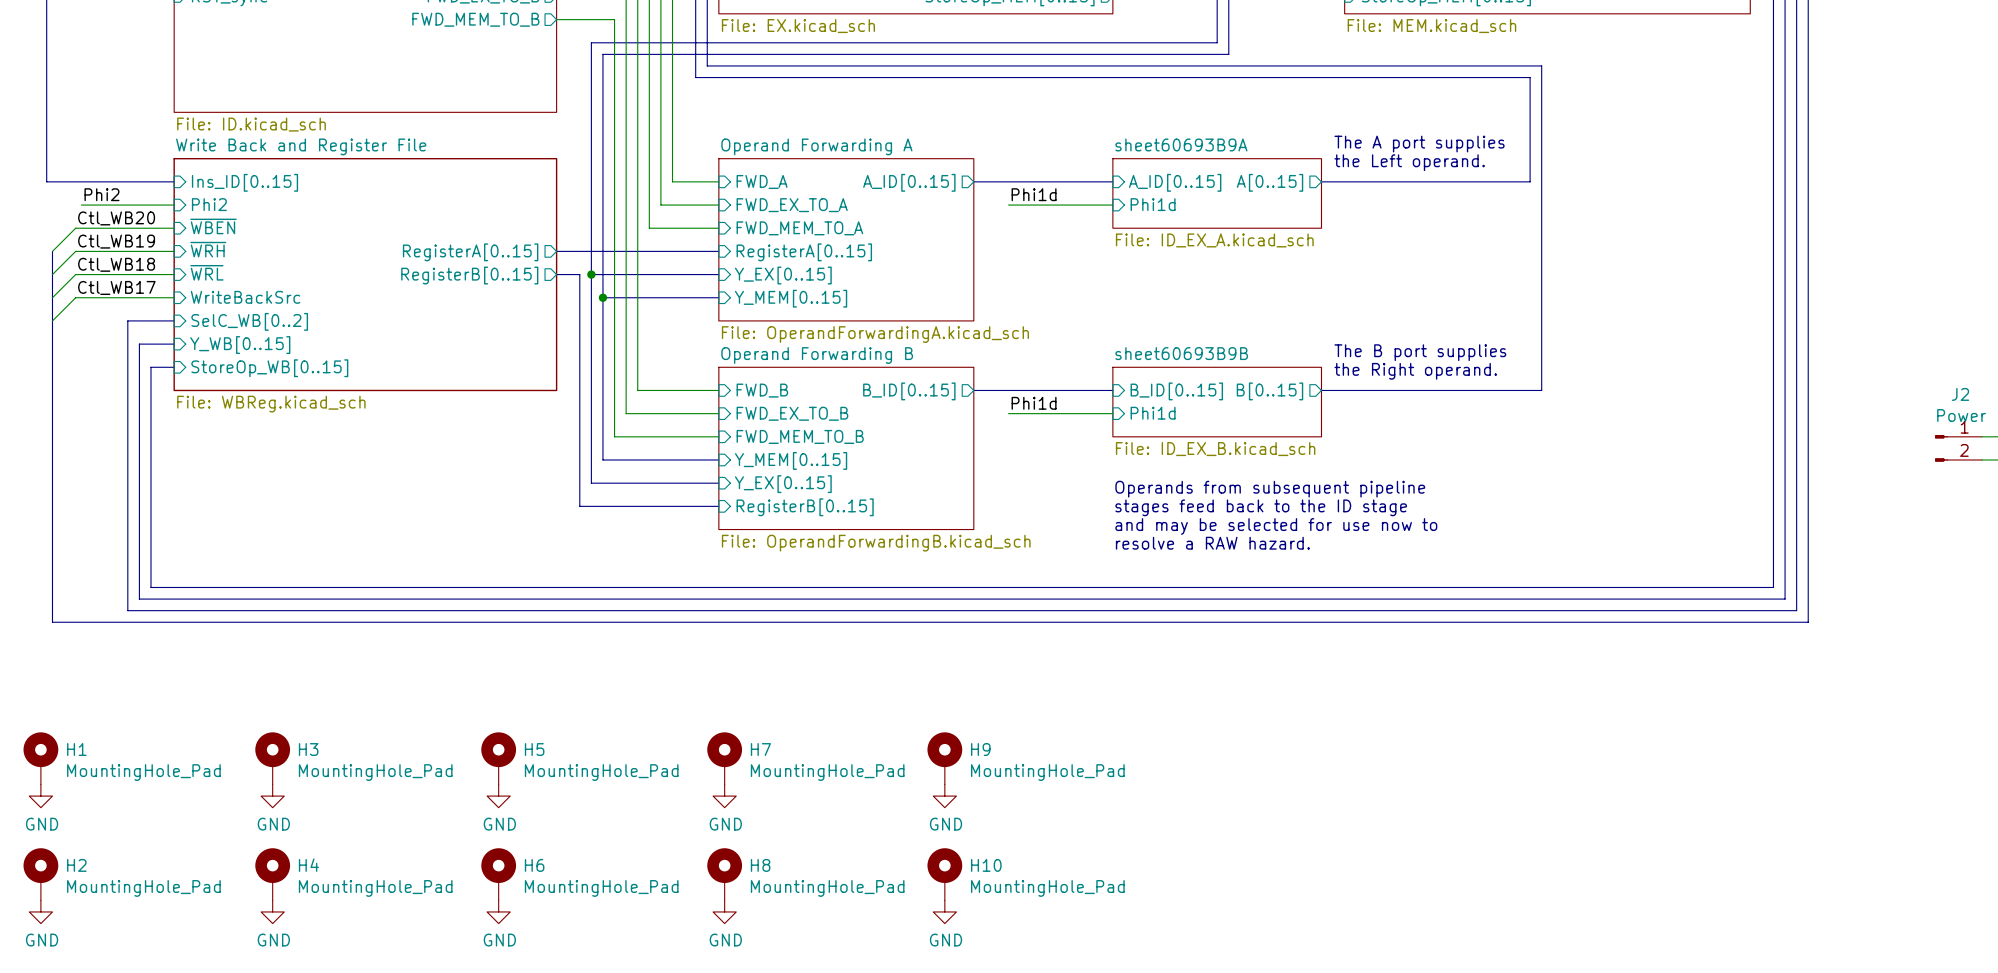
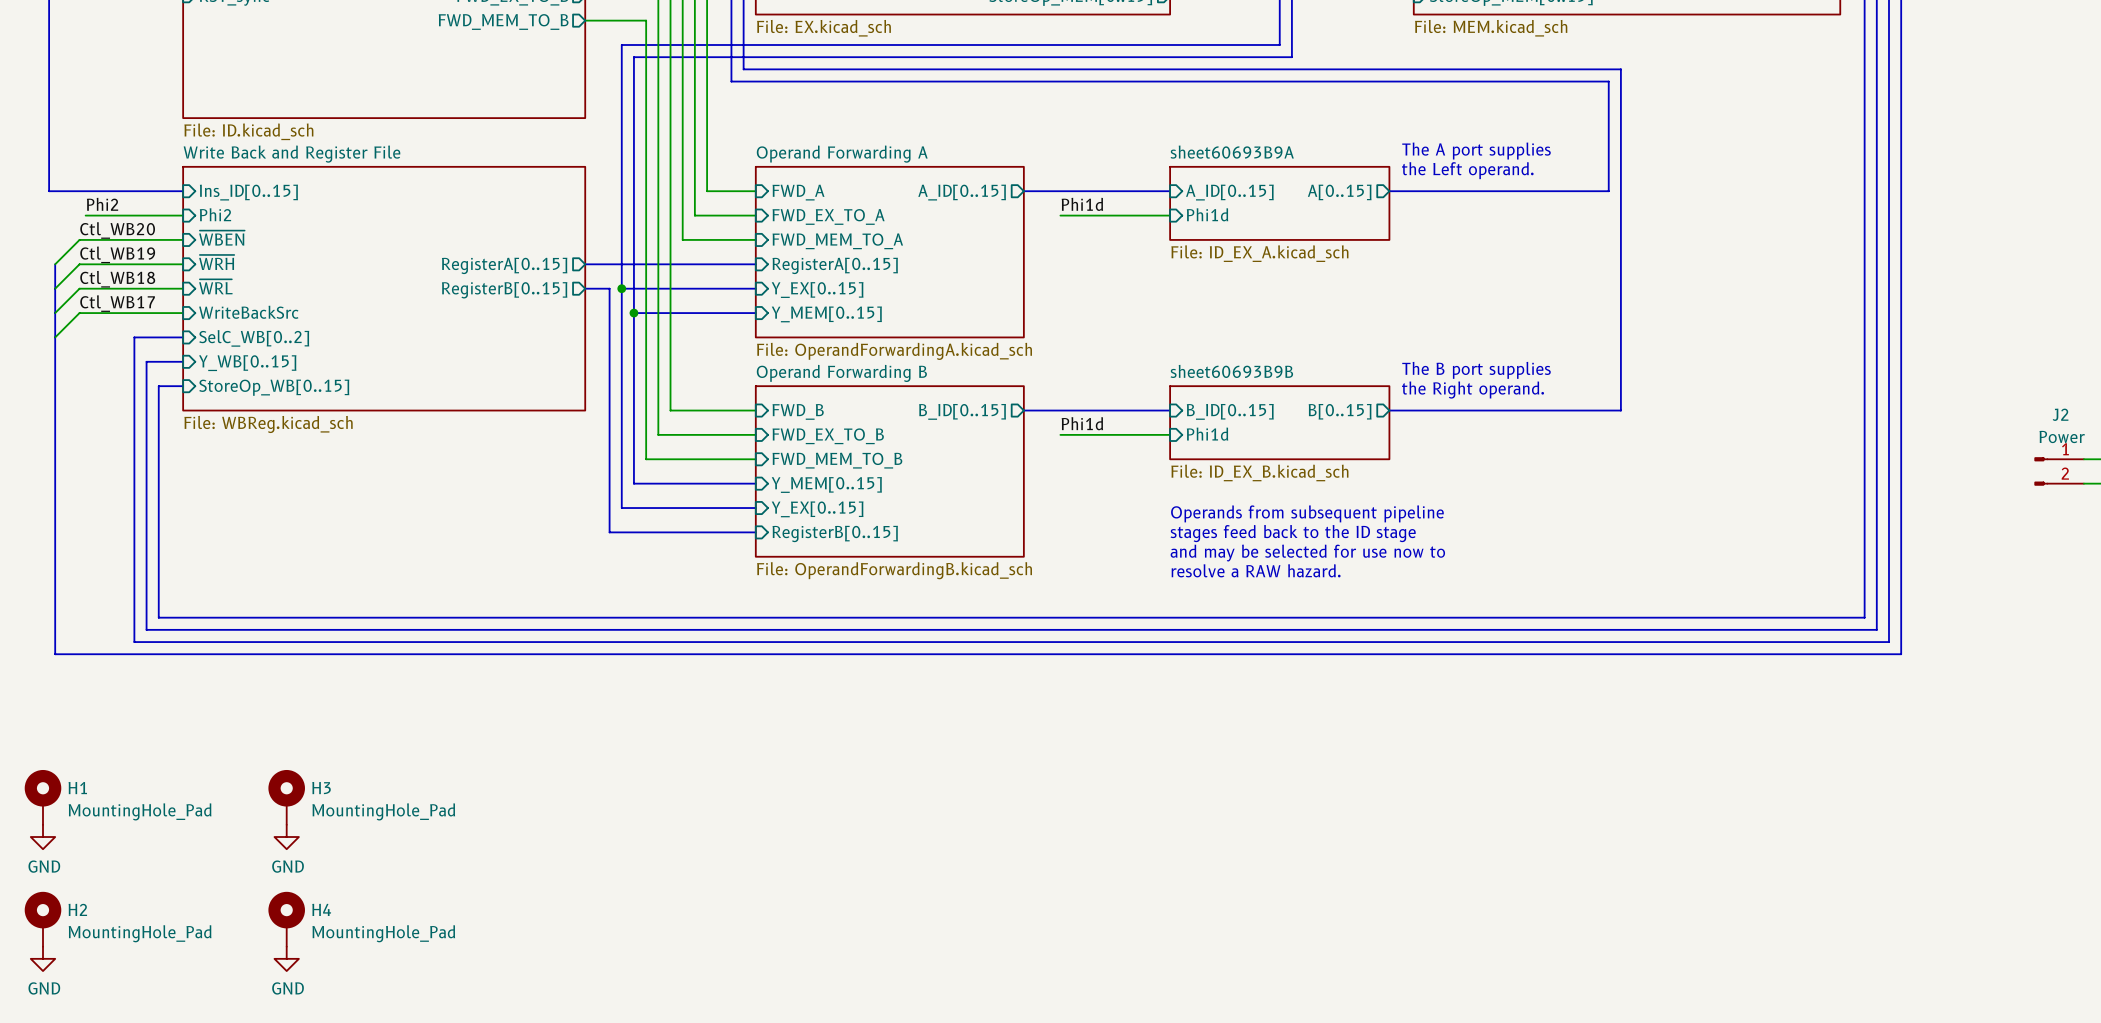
H5: MountingHole_Pad (498, 758) -> none
H7: MountingHole_Pad (724, 758) -> none
H9: MountingHole_Pad (944, 758) -> none
power symbol: GND (498, 796) -> none
power symbol: GND (724, 796) -> none
power symbol: GND (944, 796) -> none
H6: MountingHole_Pad (498, 874) -> none
H8: MountingHole_Pad (724, 874) -> none
H10: MountingHole_Pad (944, 874) -> none
power symbol: GND (498, 911) -> none
power symbol: GND (724, 911) -> none
power symbol: GND (944, 911) -> none

